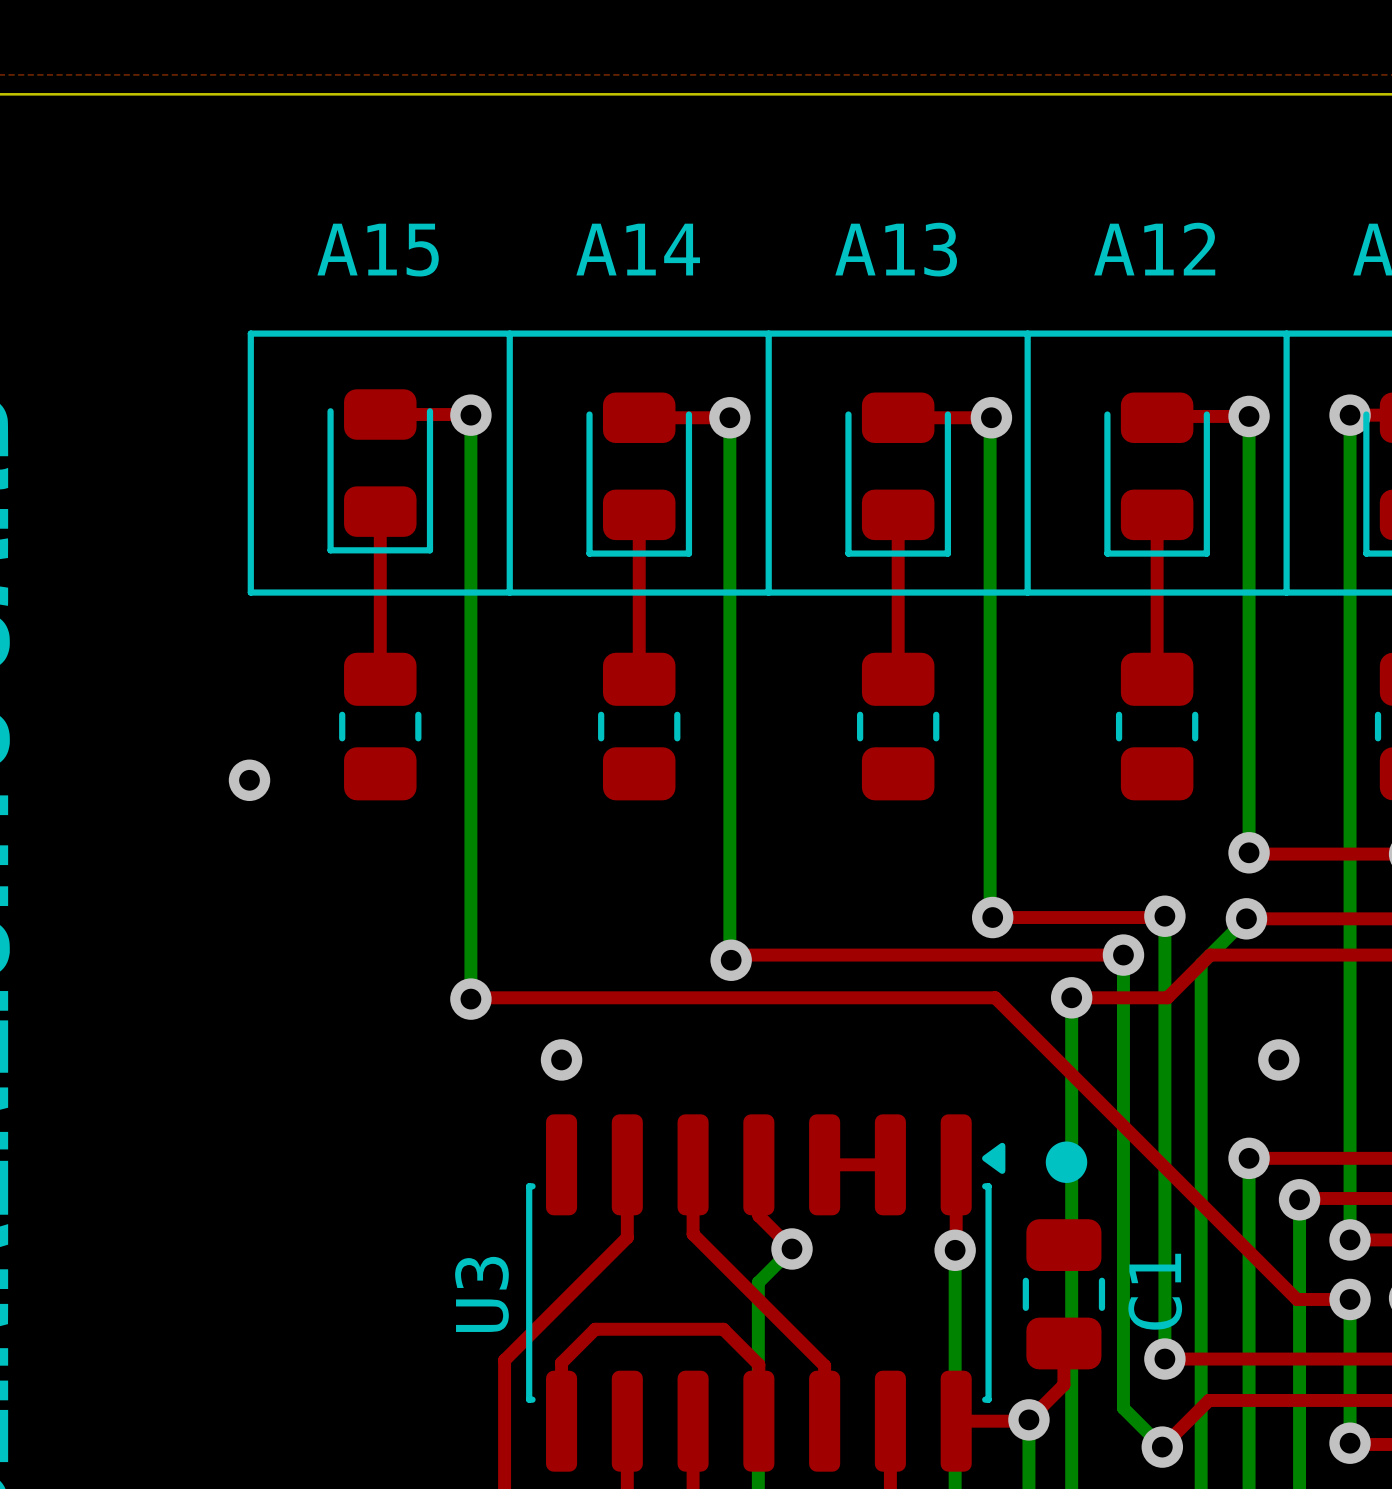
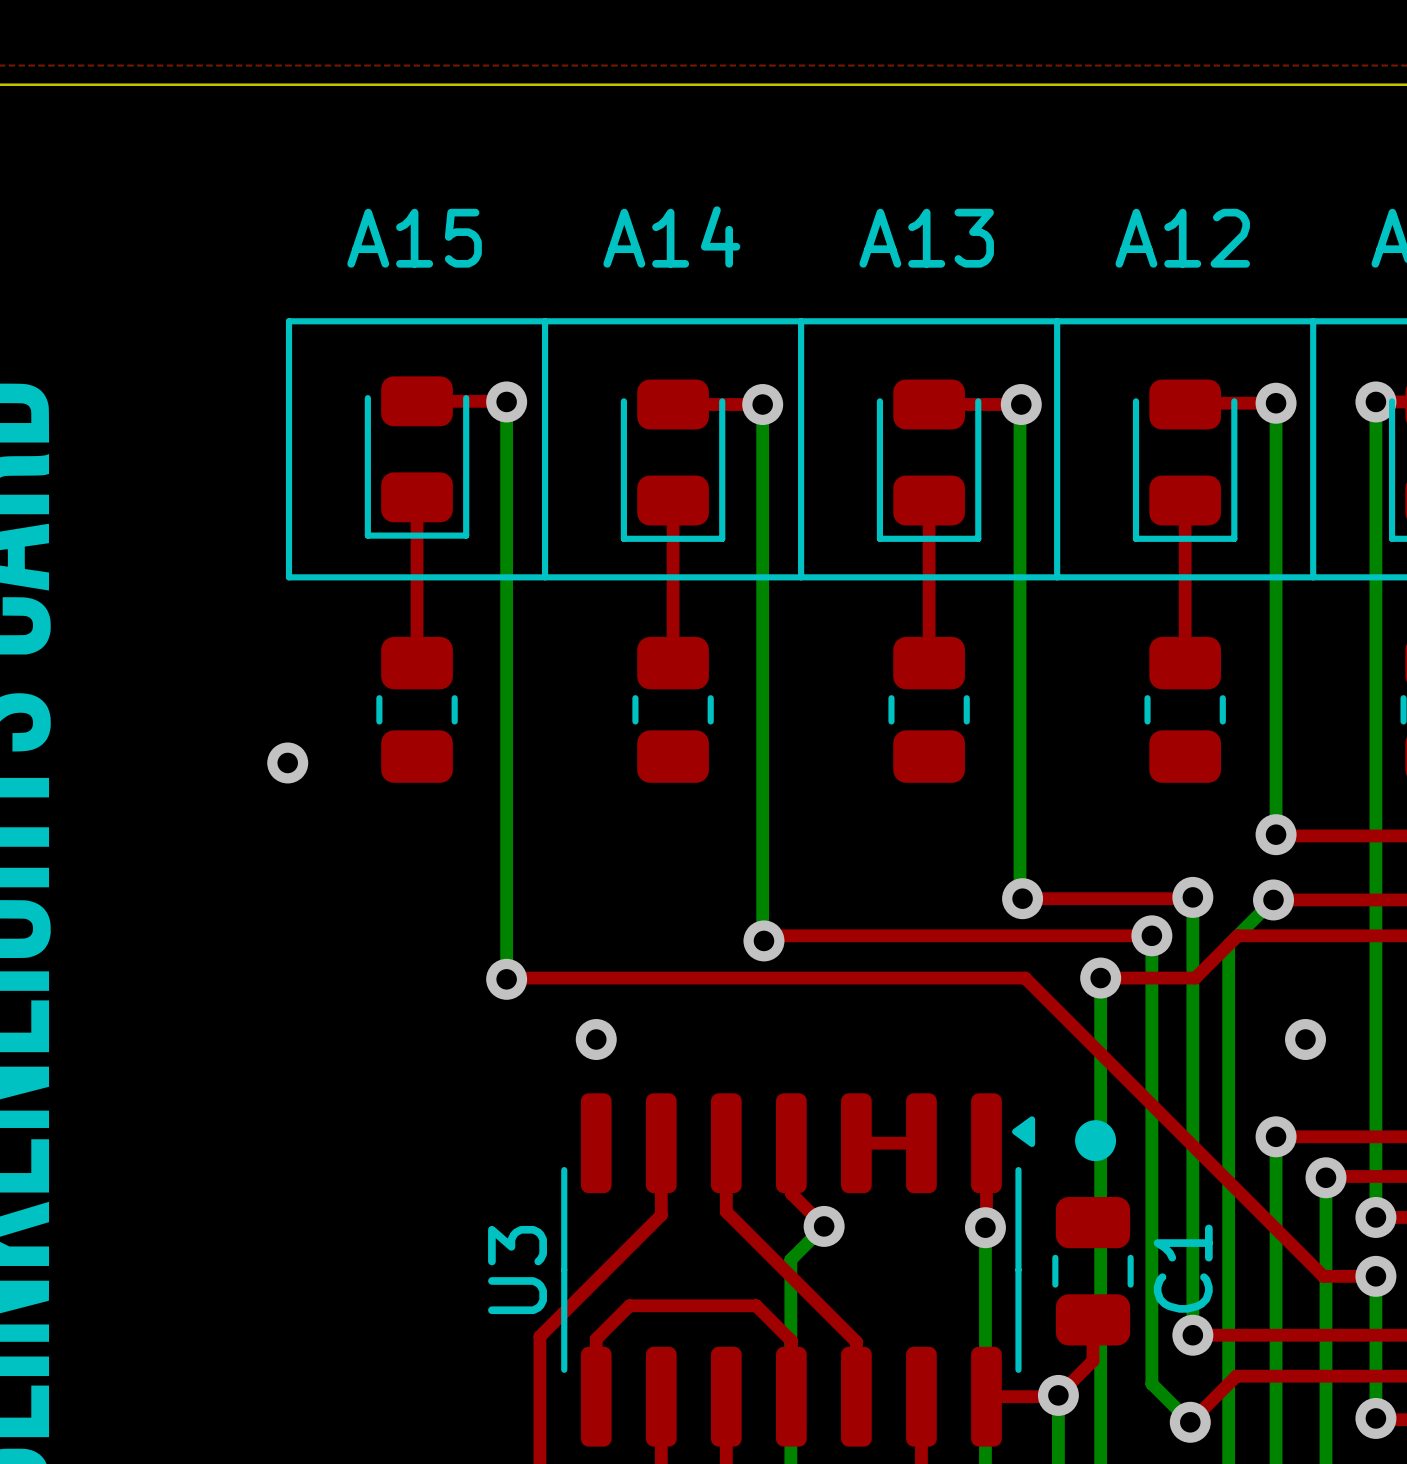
U3 footprint: [526, 1114, 1006, 1472] -> [561, 1093, 1036, 1447]

